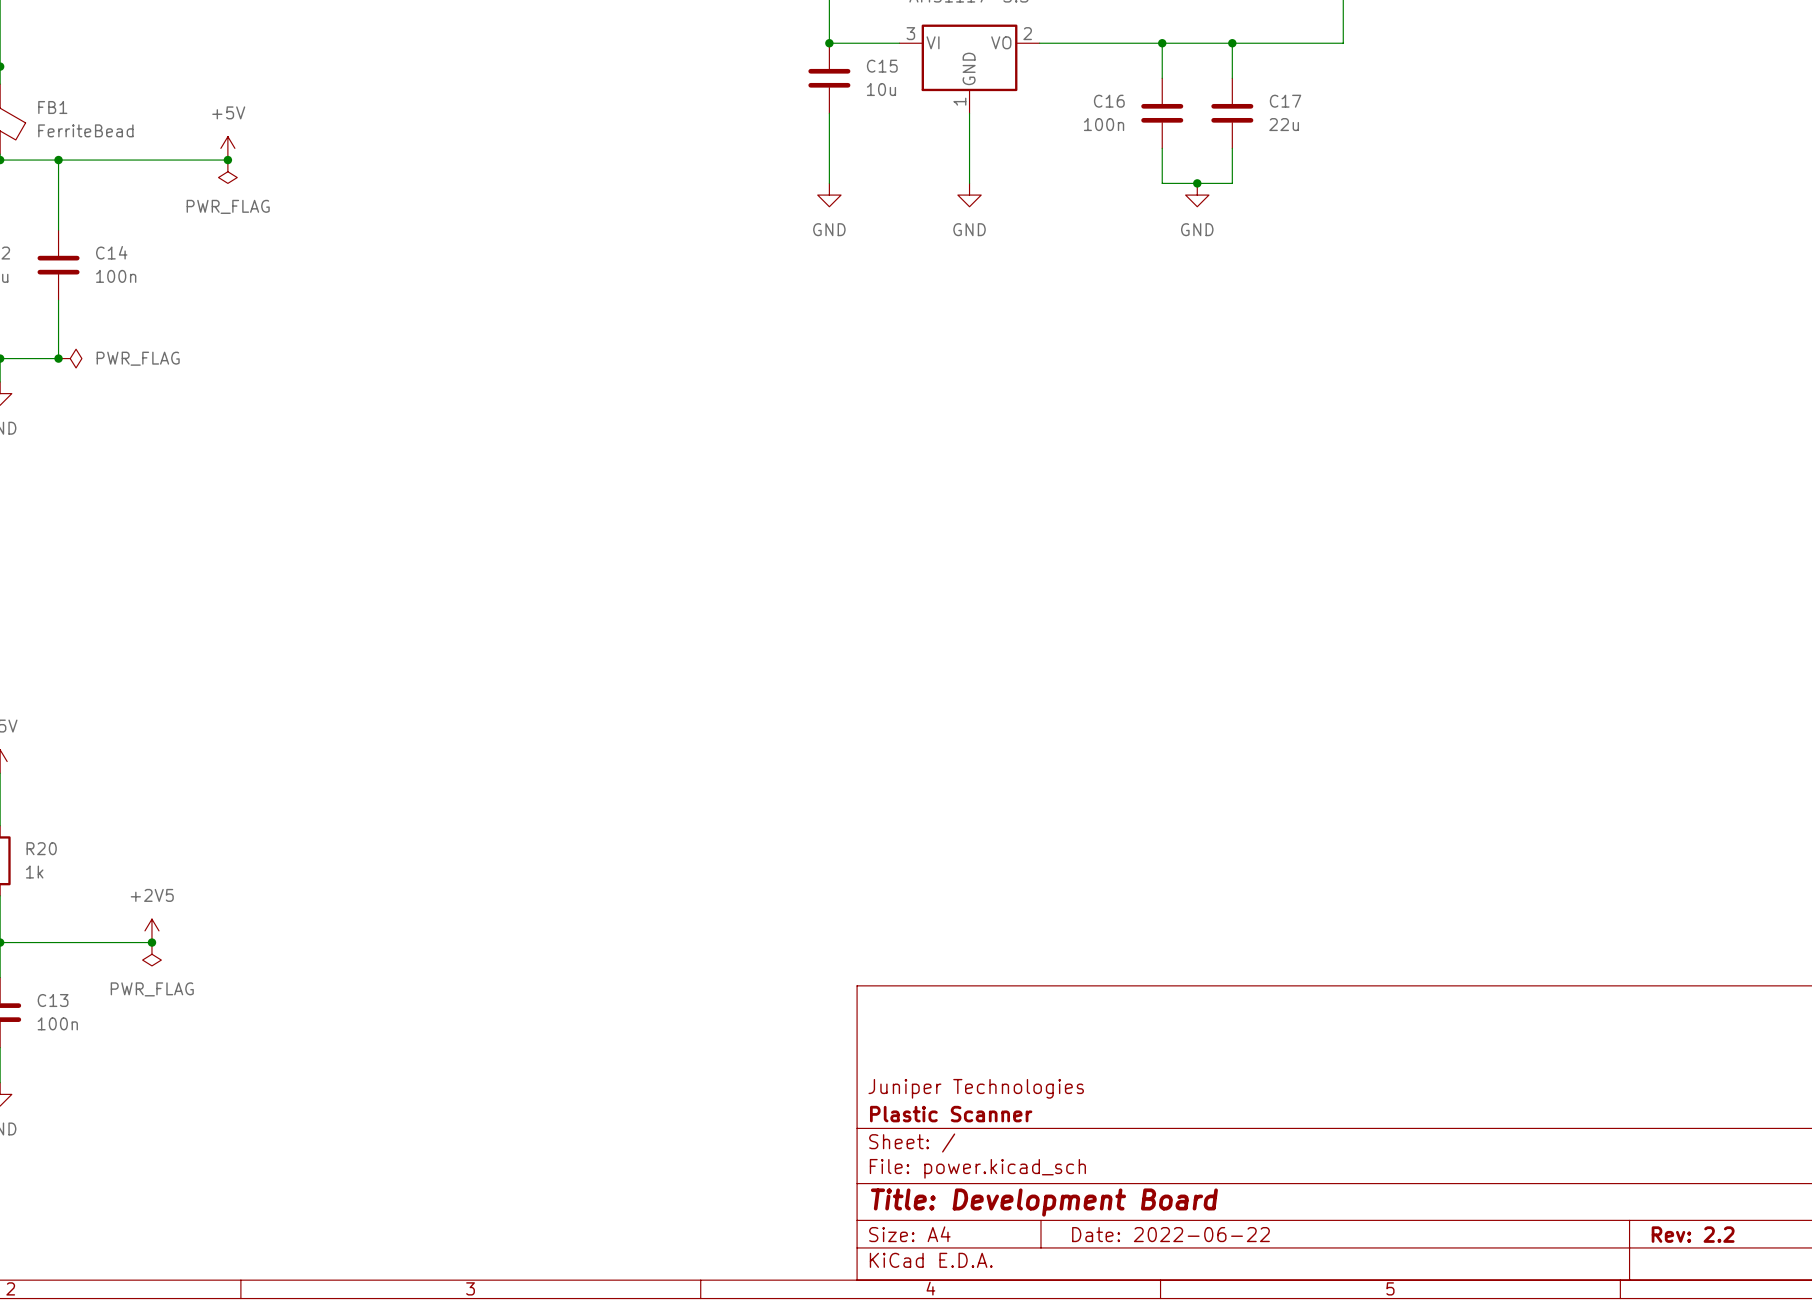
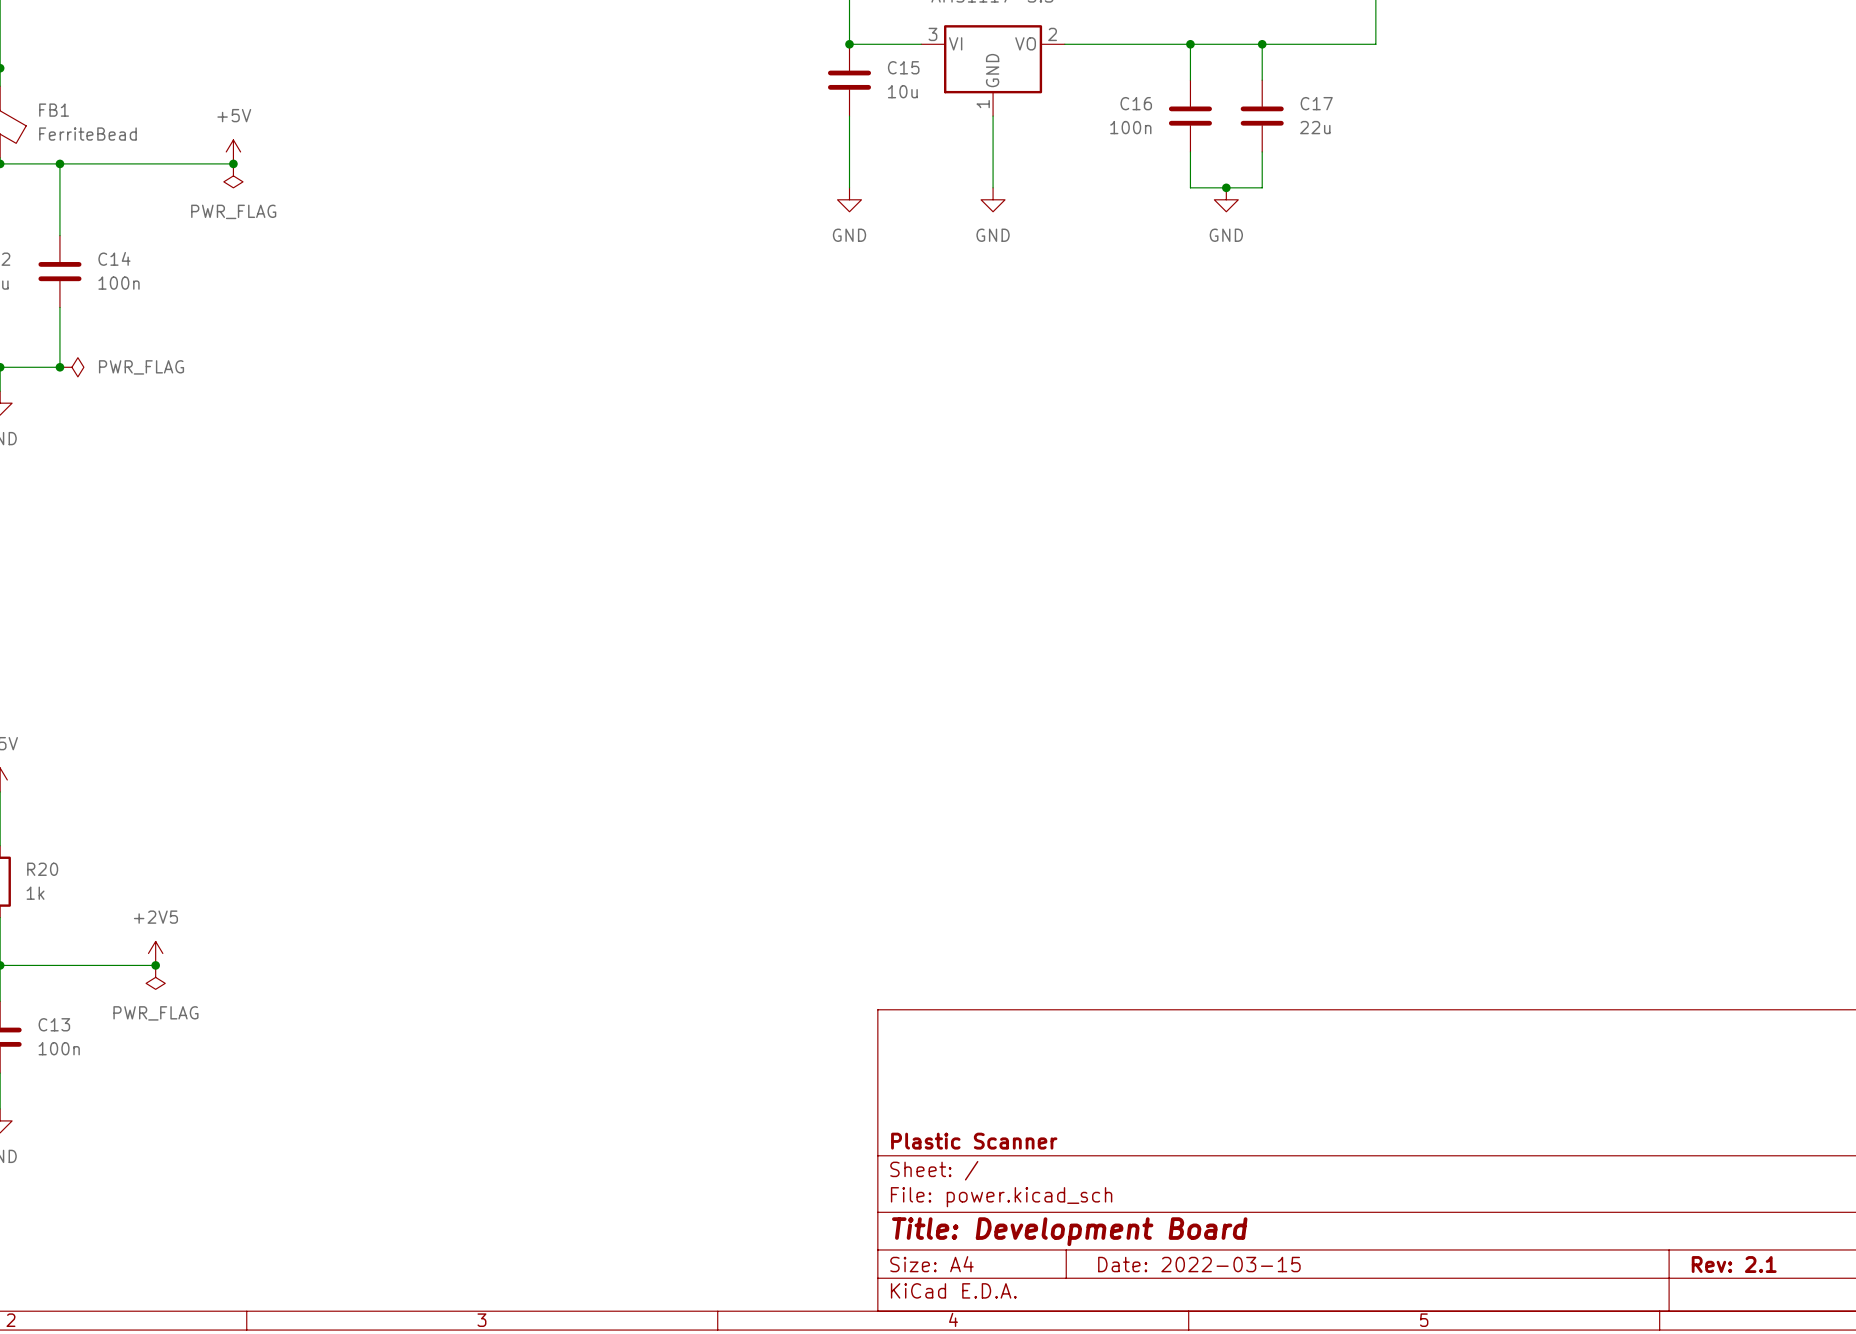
title block: Juniper Technologies (976, 1088) -> none
title block: Date: 2022-06-22 (1170, 1234) -> Date: 2022-03-15 (1199, 1264)
title block: Rev: 2.2 (1693, 1234) -> Rev: 2.1 (1734, 1264)

